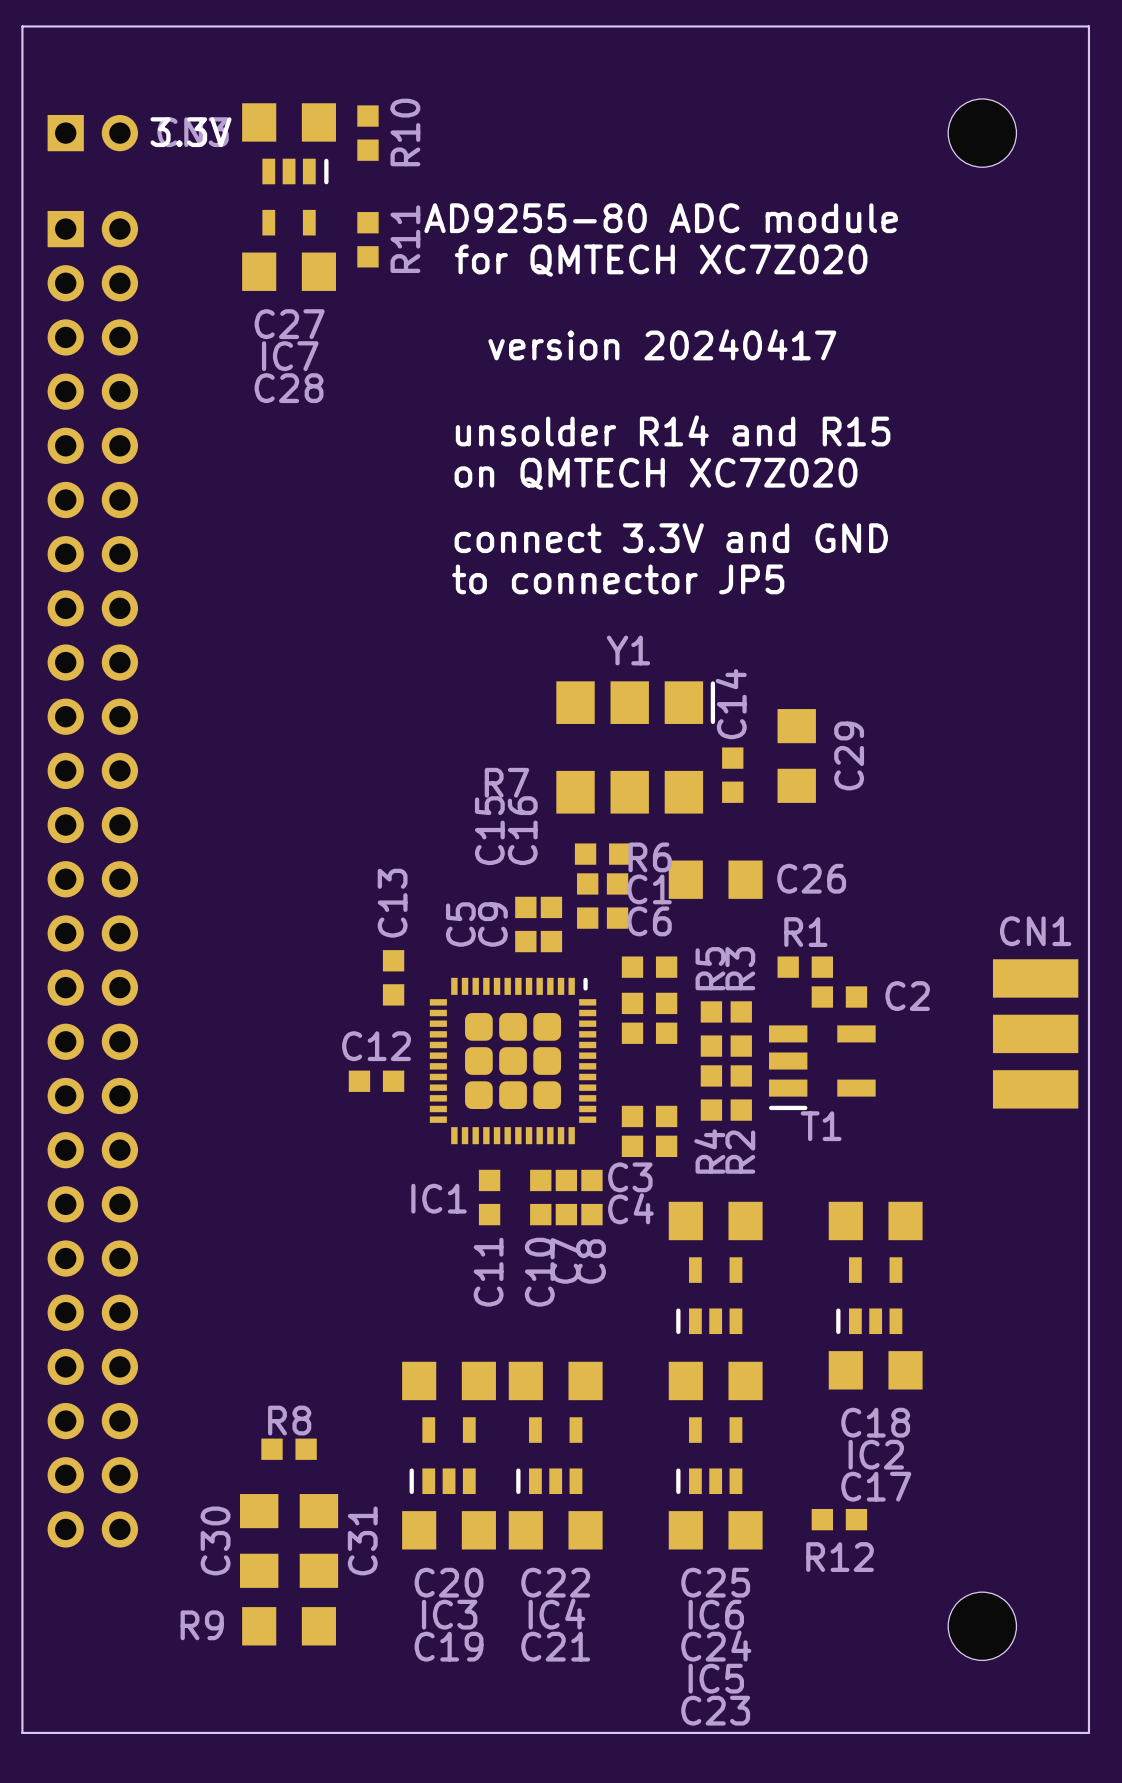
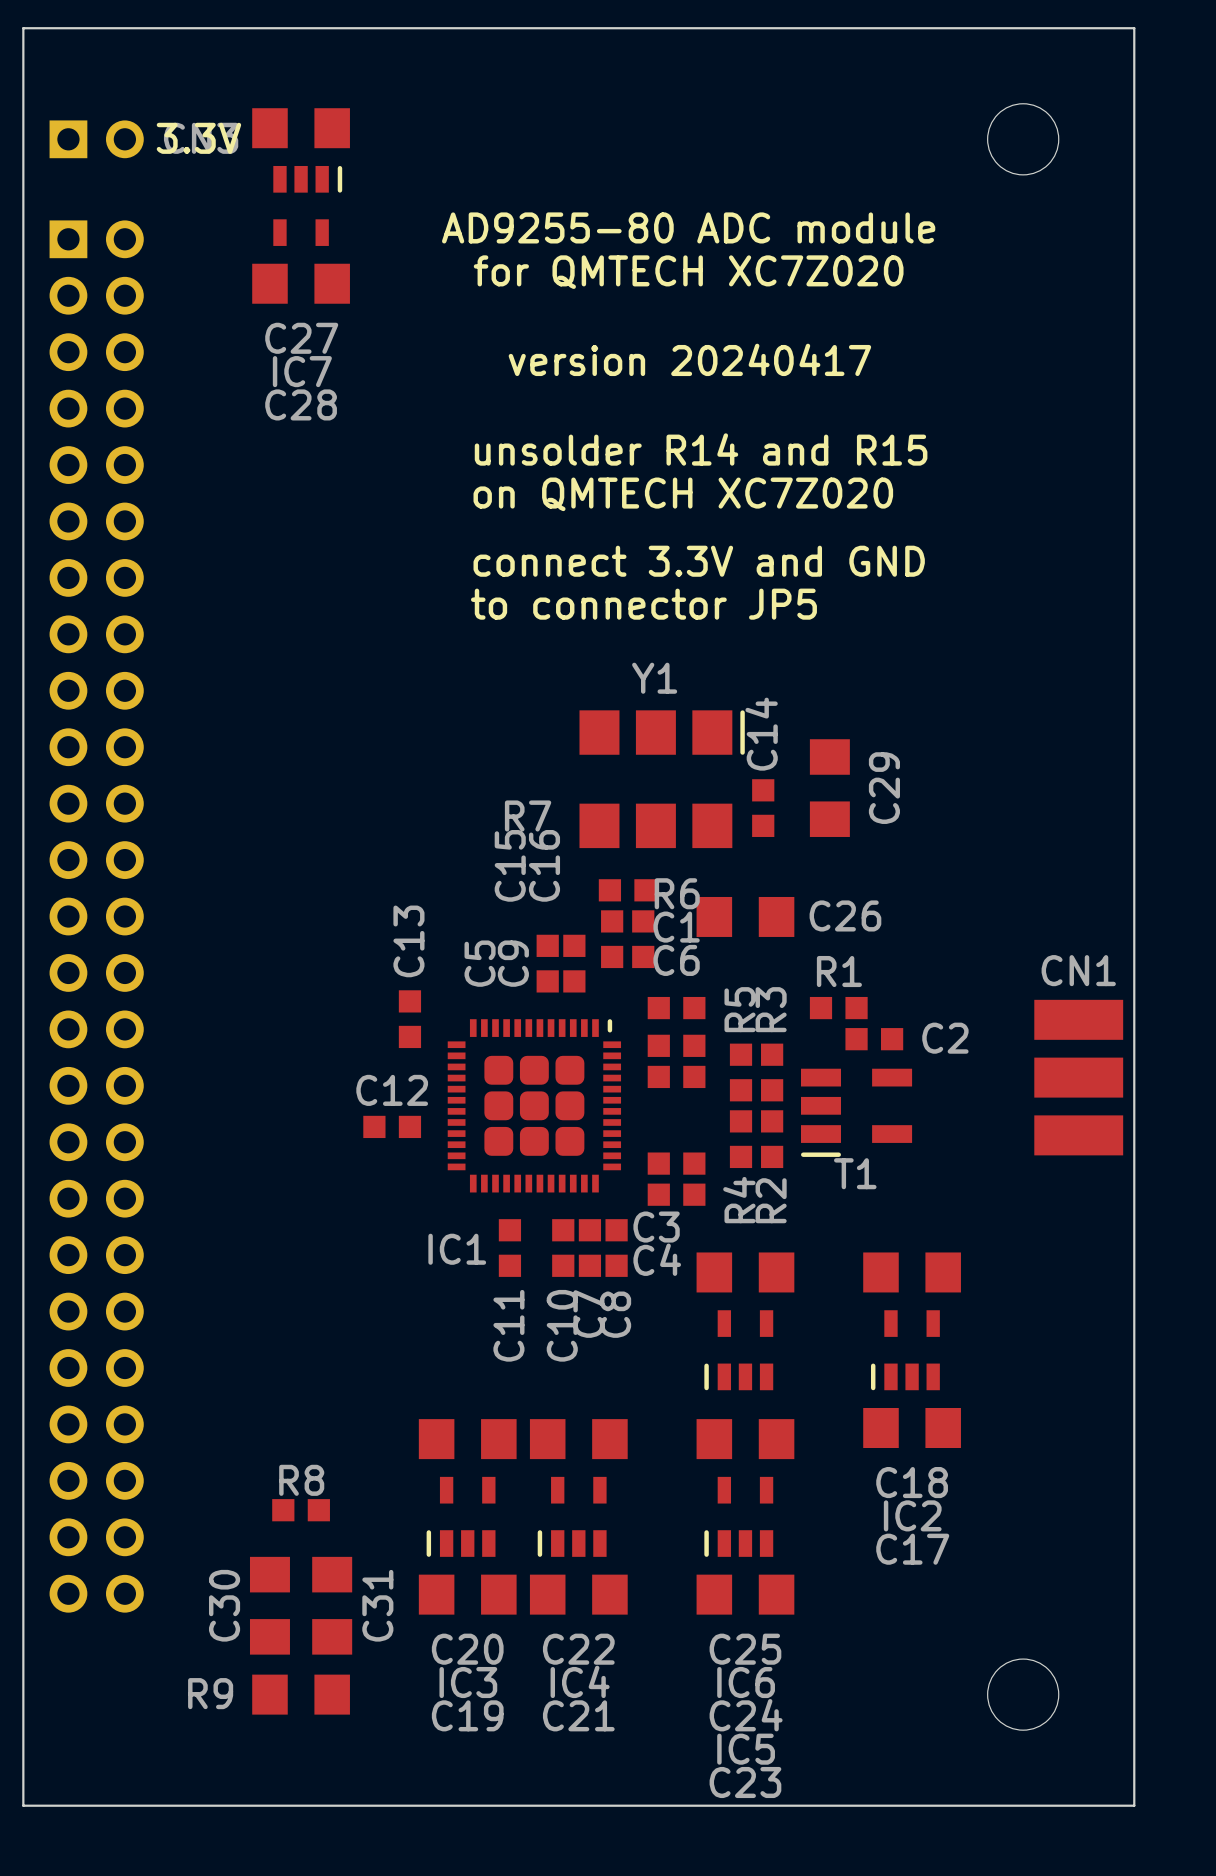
R10: (367, 133) -> none
R11: (367, 239) -> none
R12: (839, 1519) -> none

